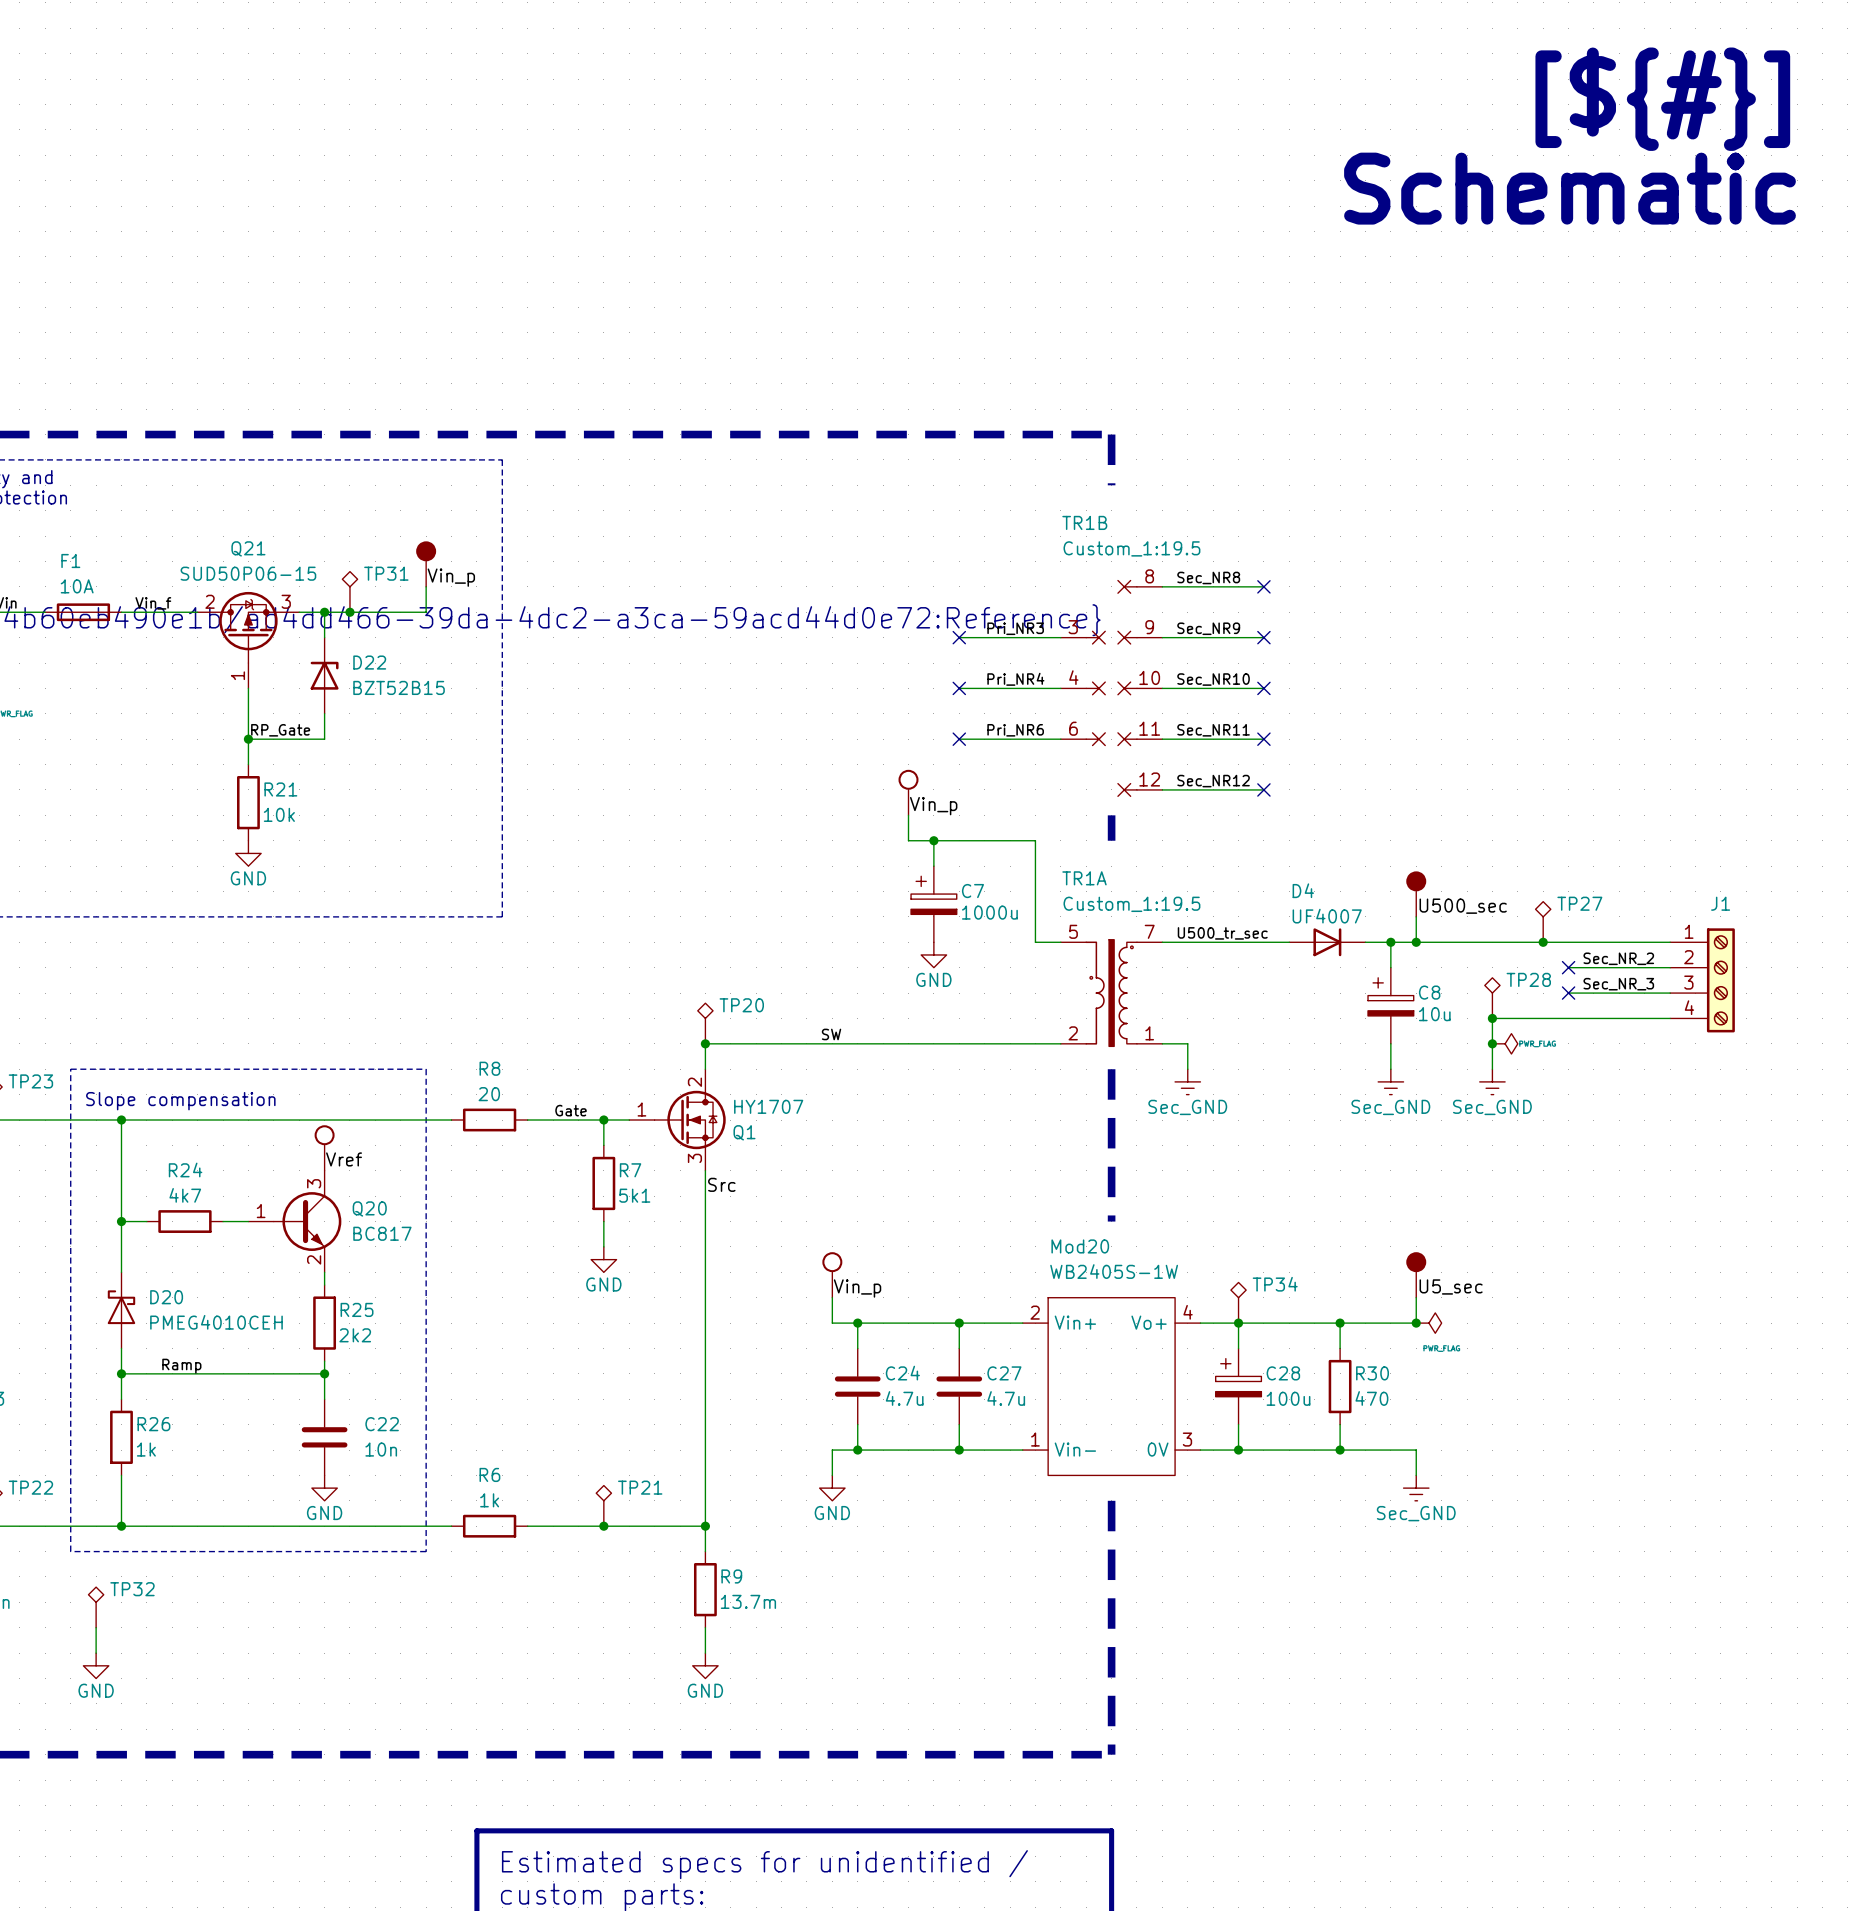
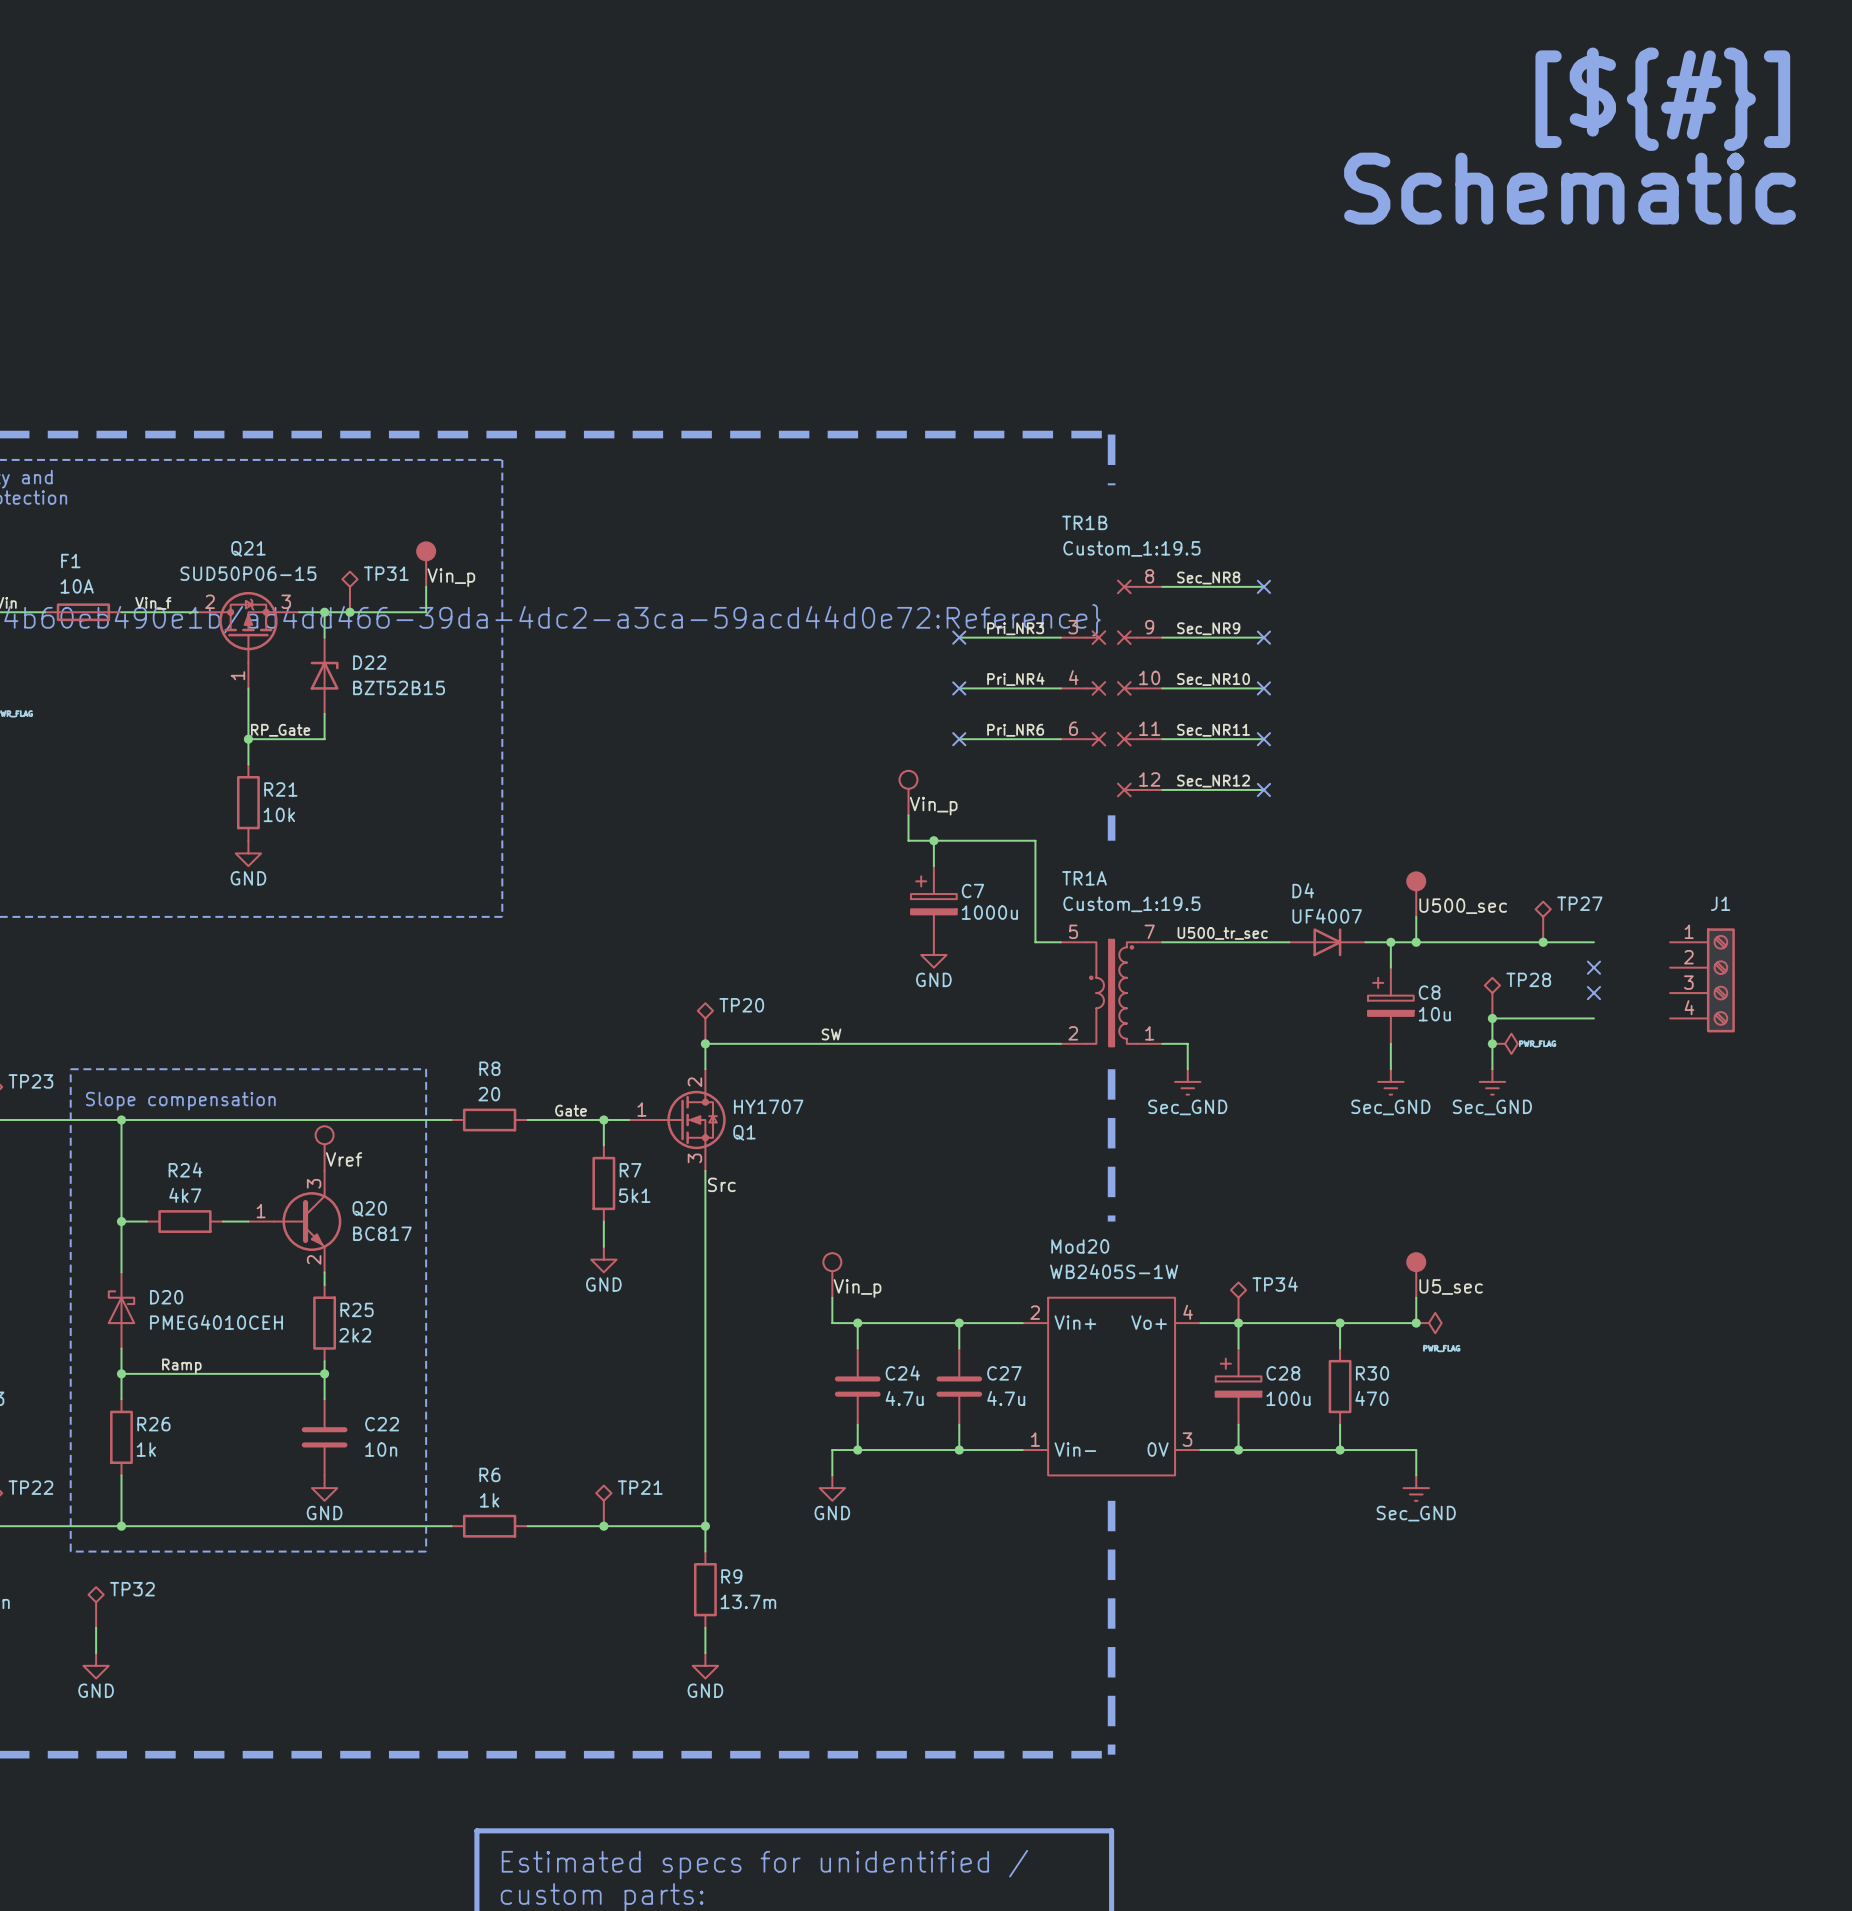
wire: (1593, 942) (1670, 942) -> none
label: Sec_NR_2 (1618, 958) -> none
wire: (1568, 967) (1670, 967) -> none
no-connect mark: (1568, 967) -> none
no-connect mark: none -> (1593, 967)
label: Sec_NR_3 (1618, 984) -> none
wire: (1568, 993) (1670, 993) -> none
no-connect mark: (1568, 993) -> none
no-connect mark: none -> (1593, 993)
wire: (1593, 1018) (1670, 1018) -> none

